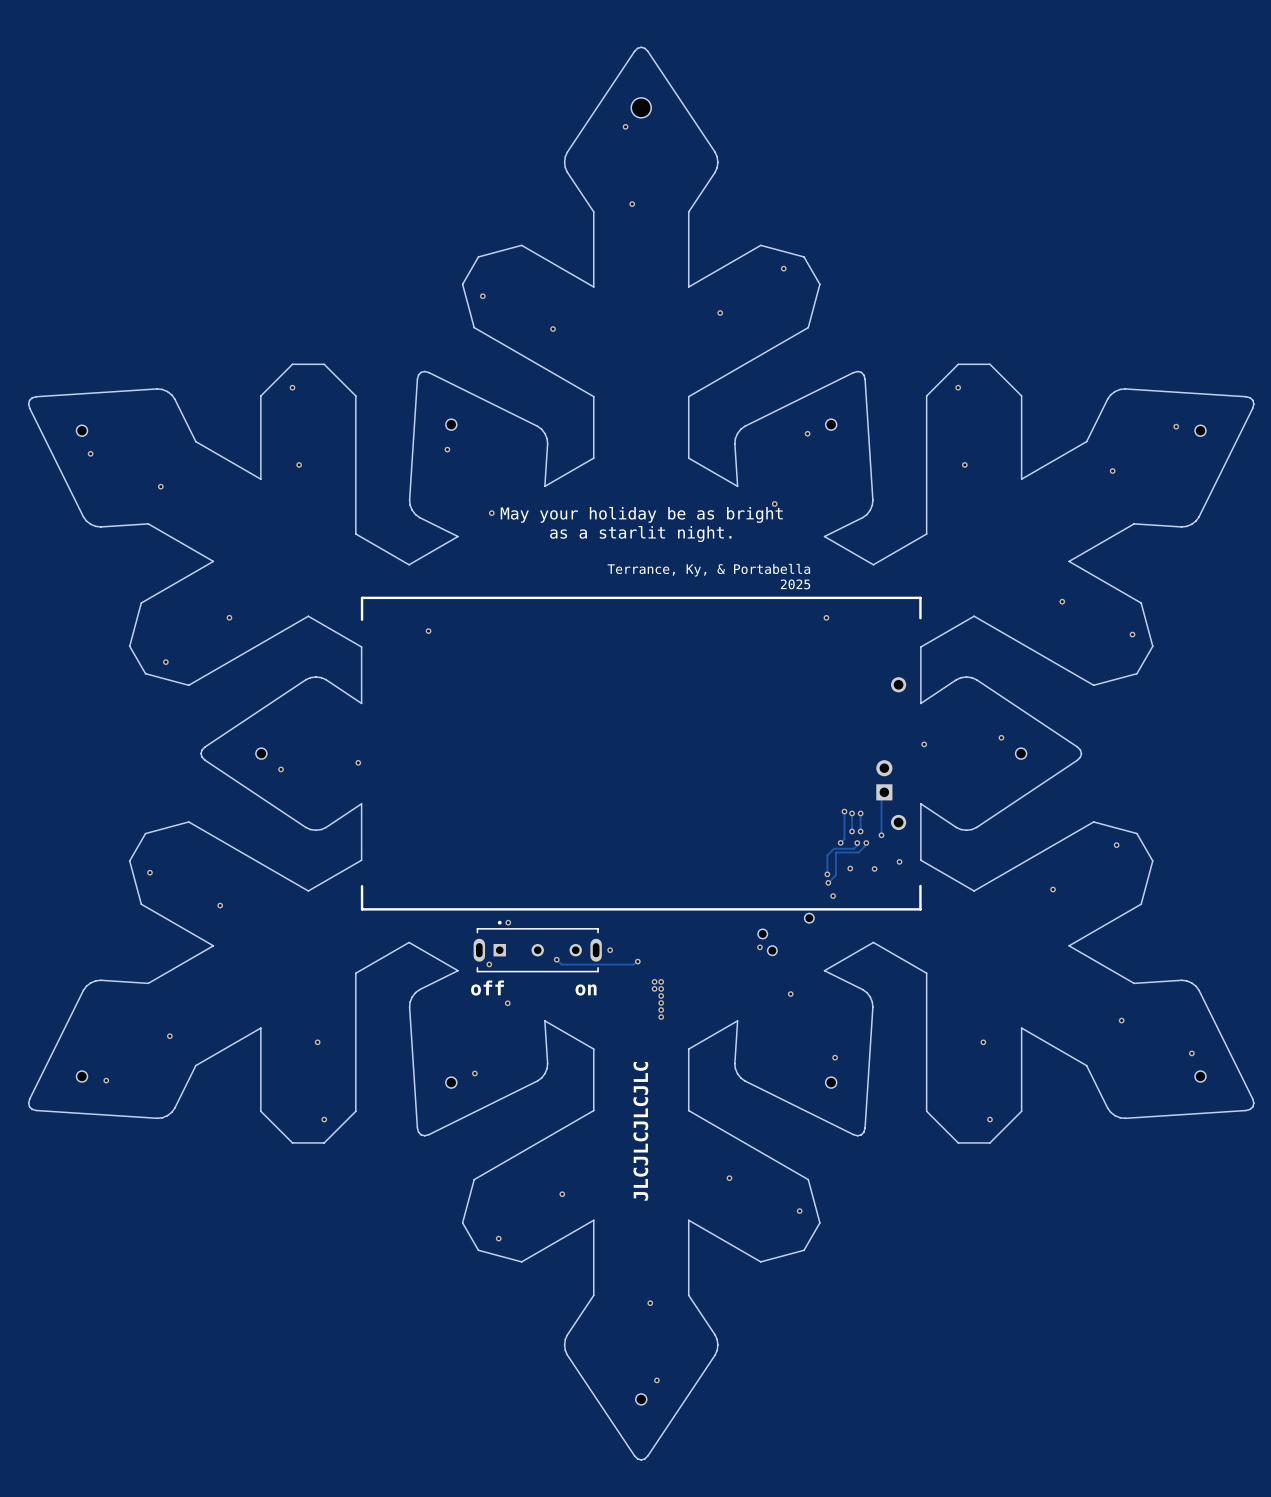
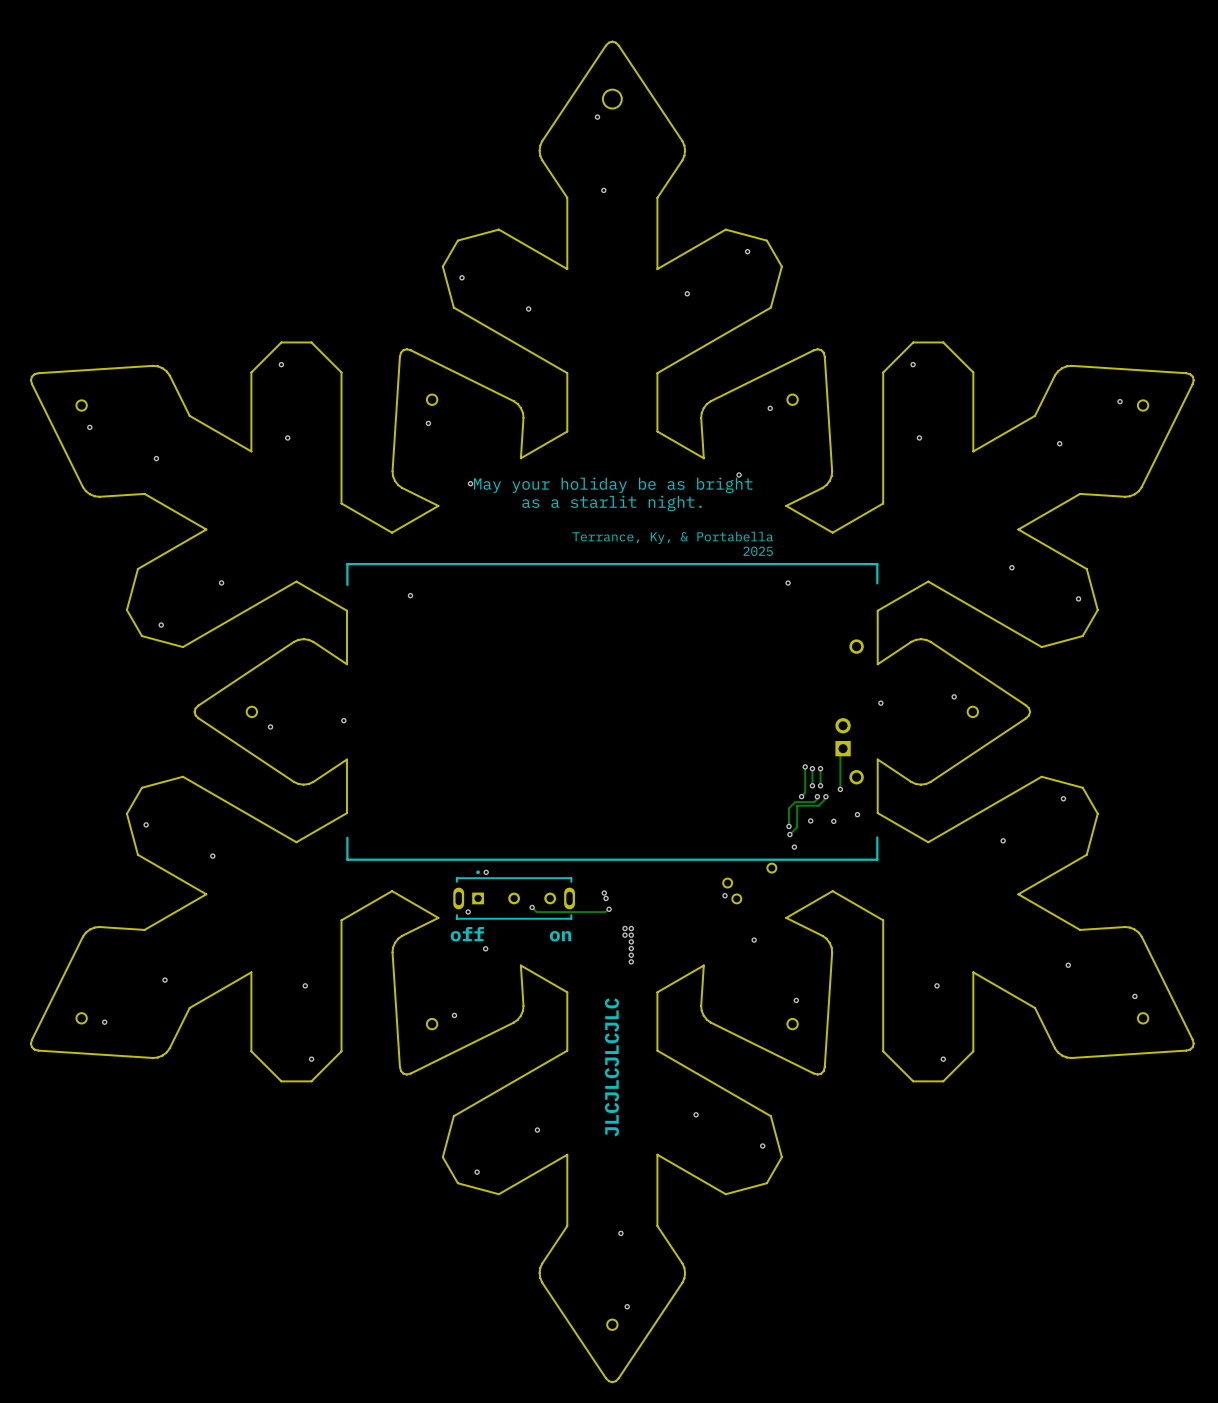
via: none -> (604, 893)
via: (610, 950) -> none
via: none -> (606, 898)

